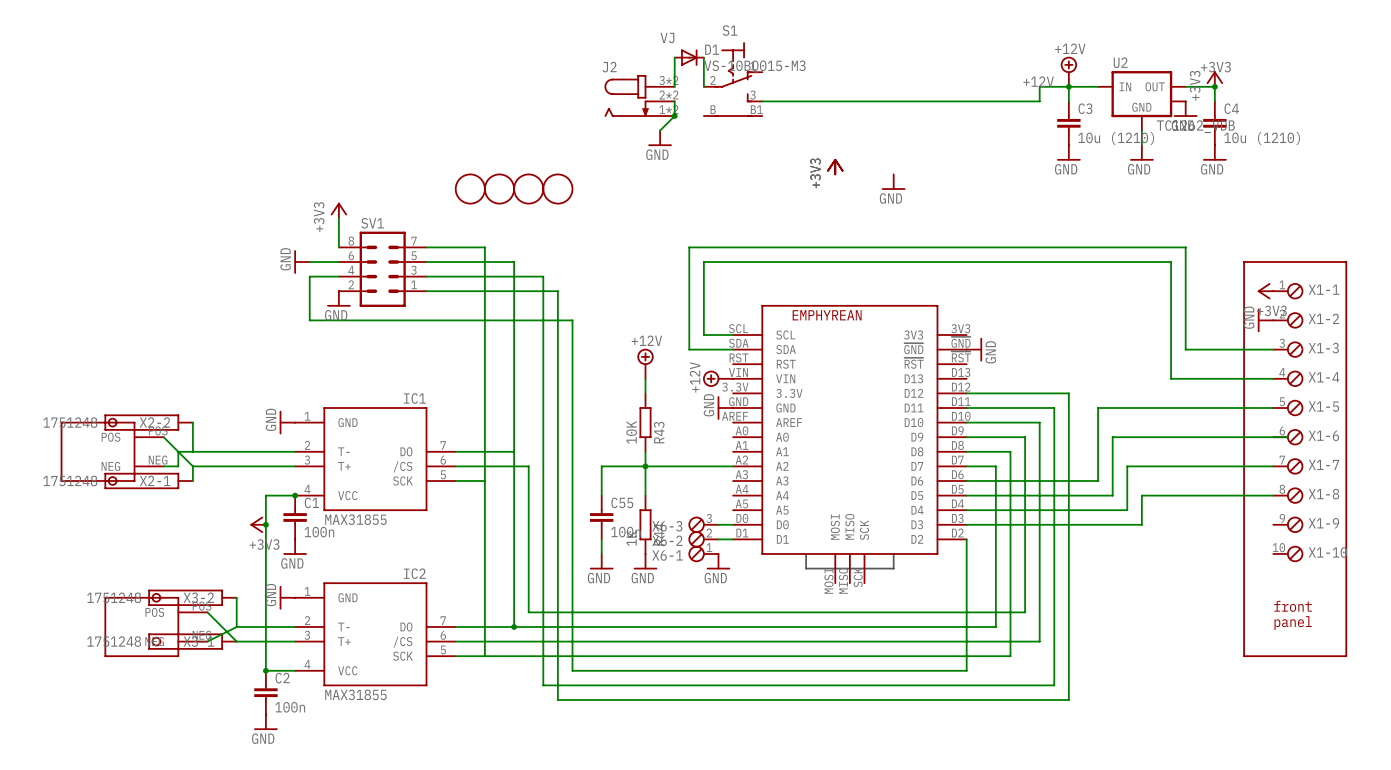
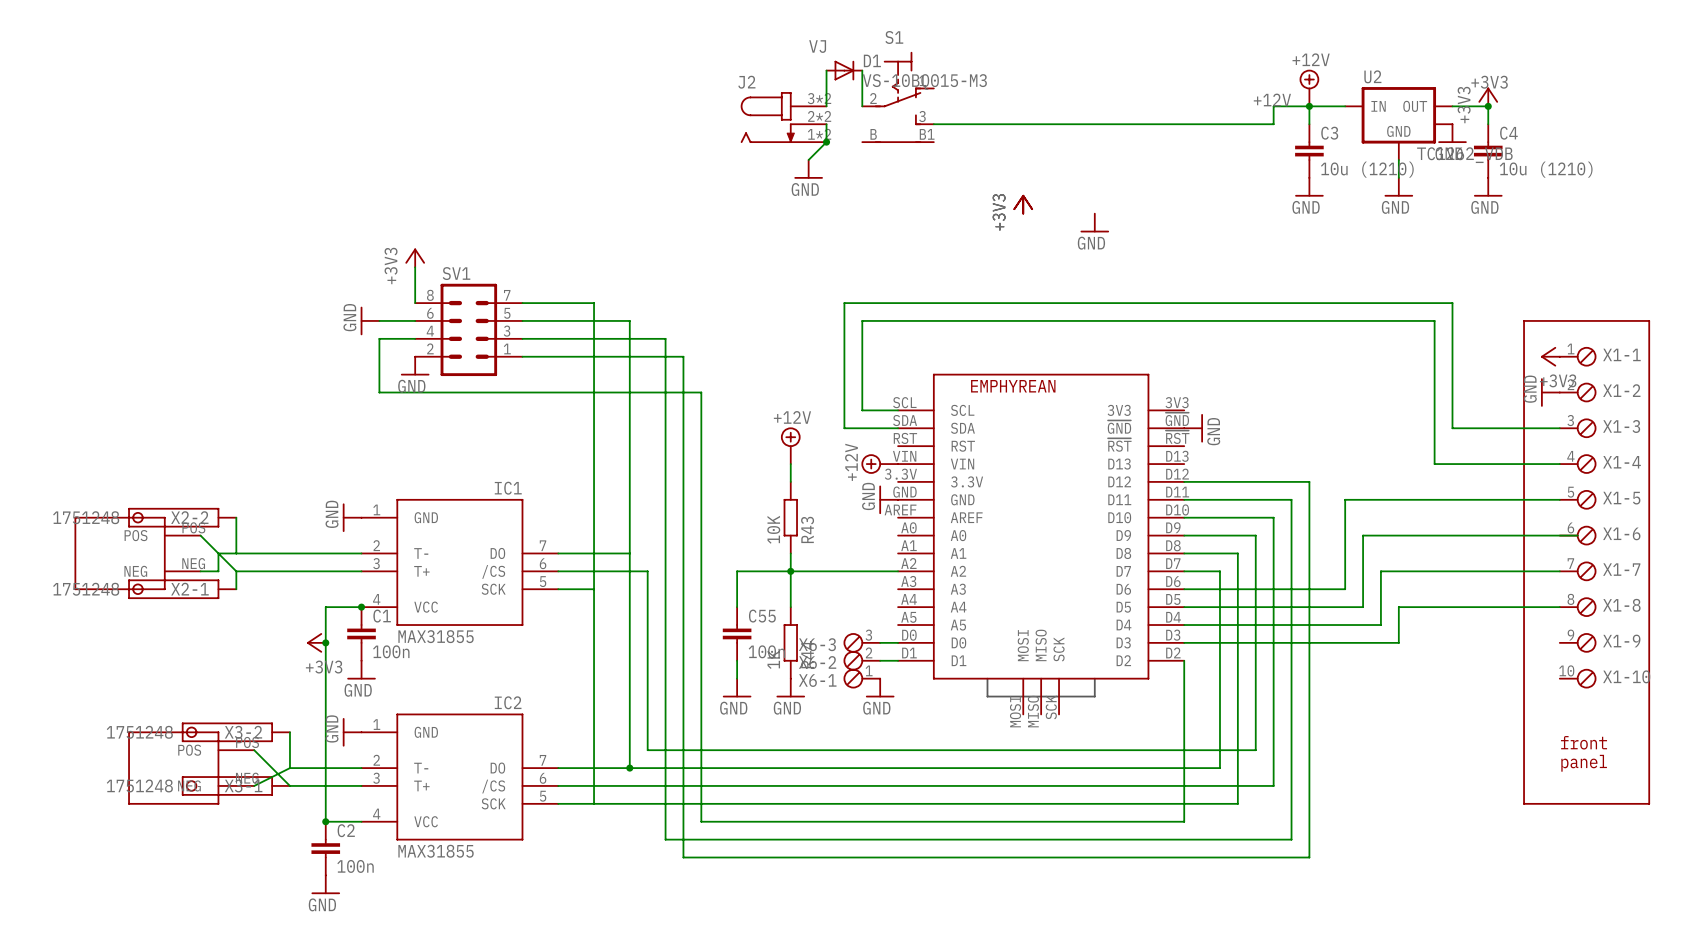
part: (470, 189) -> none
part: (499, 189) -> none
part: (528, 189) -> none
part: (557, 189) -> none

